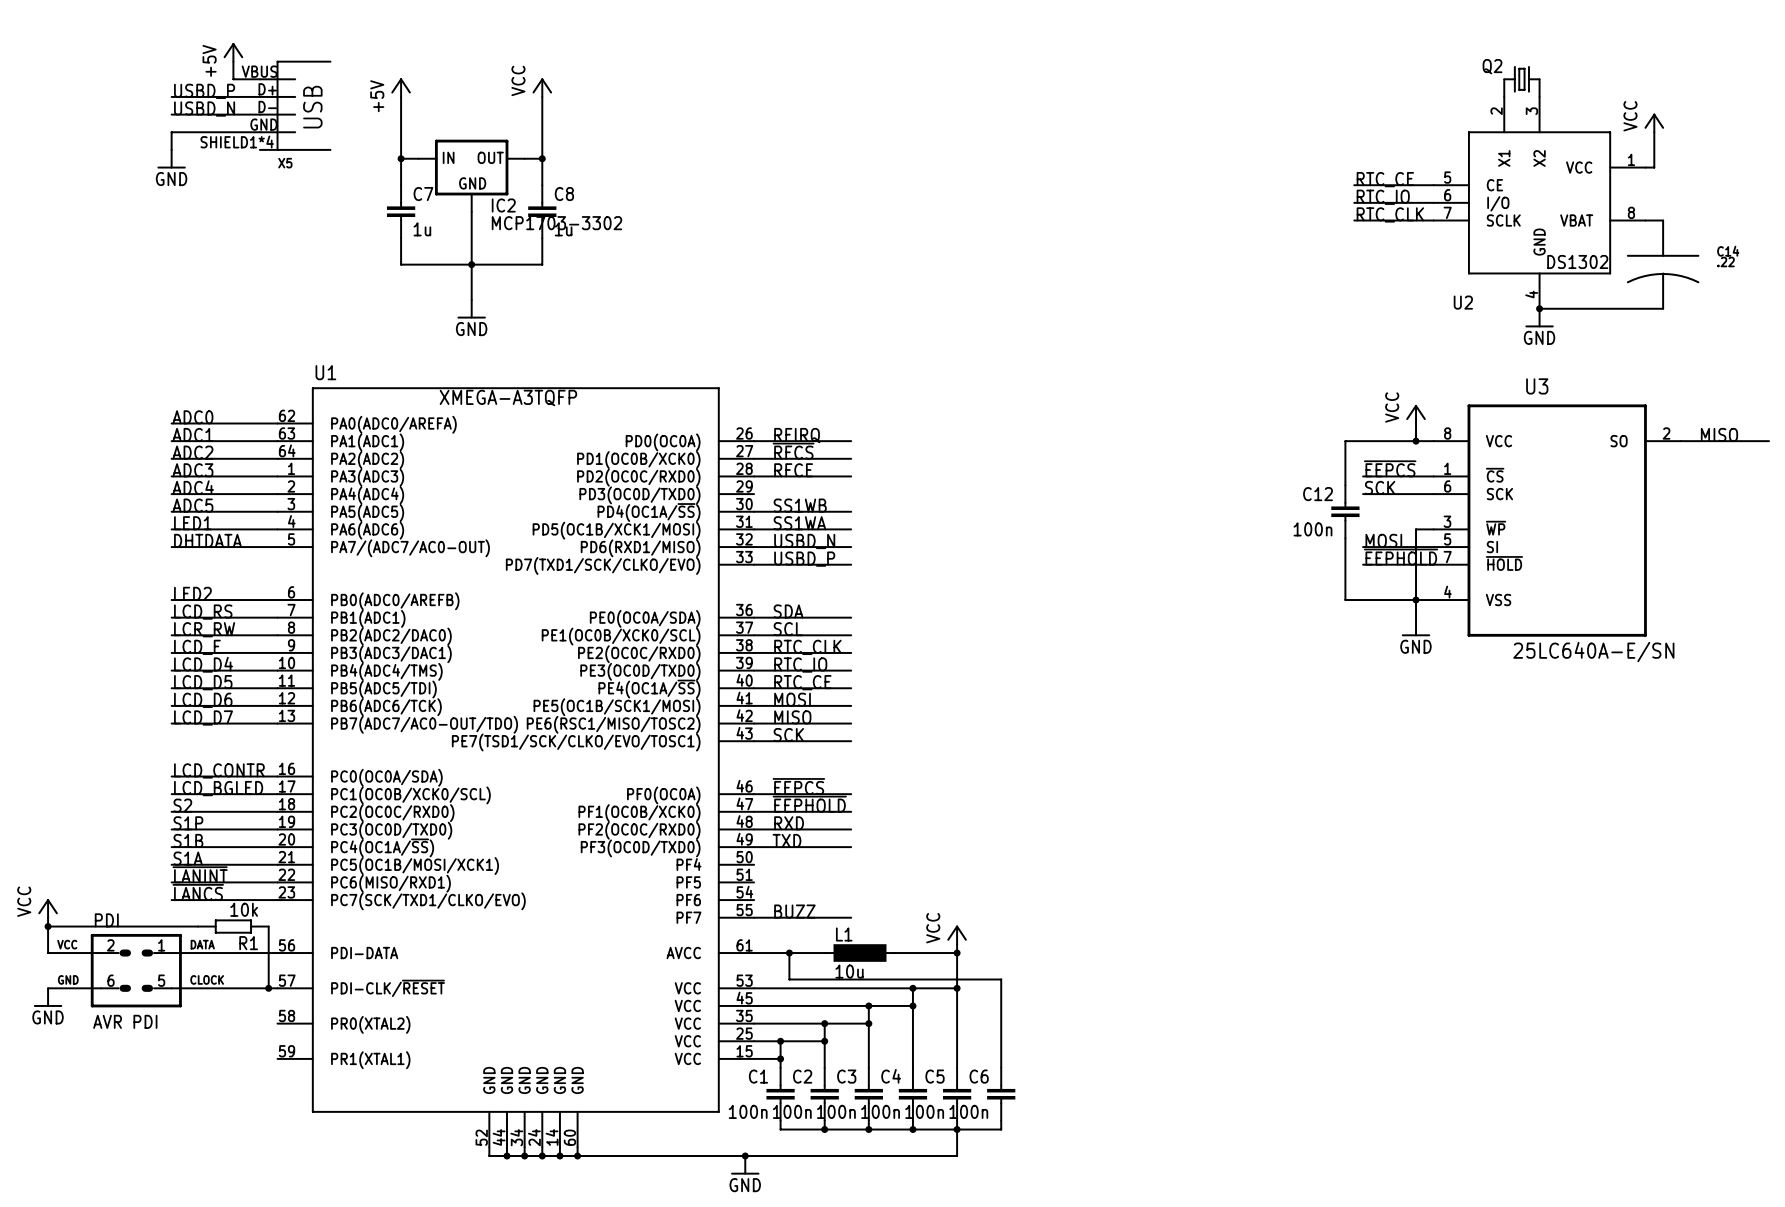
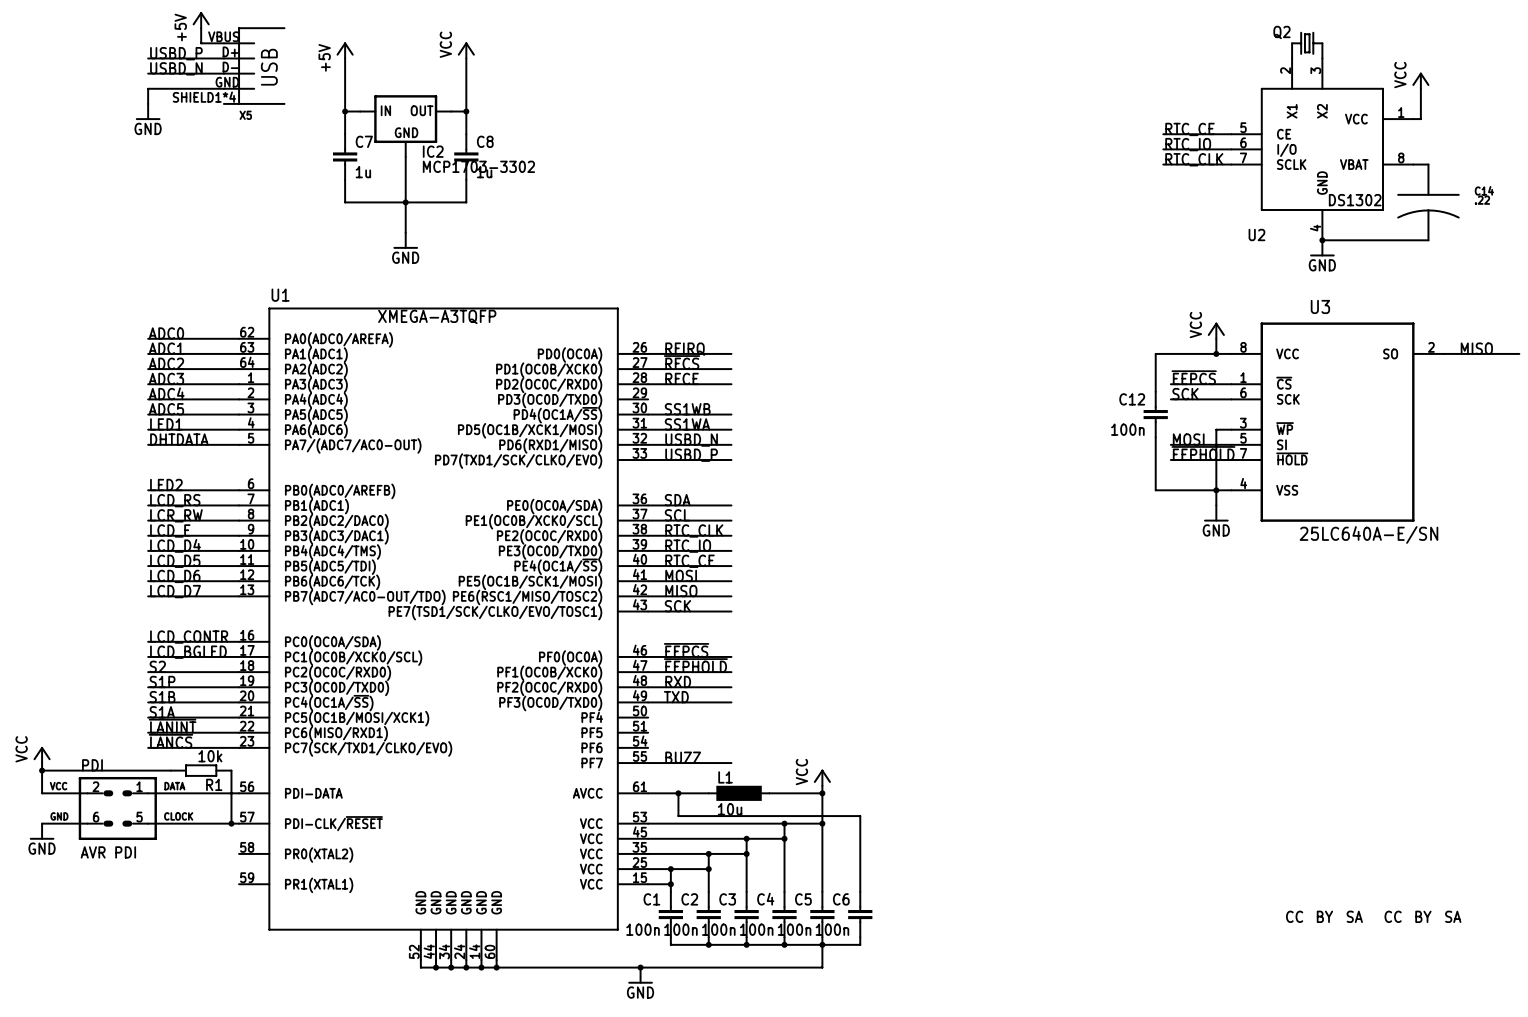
part: none -> (1294, 916)
part: none -> (1324, 916)
part: none -> (1354, 916)
part: none -> (1393, 916)
part: none -> (1423, 916)
part: none -> (1453, 916)

